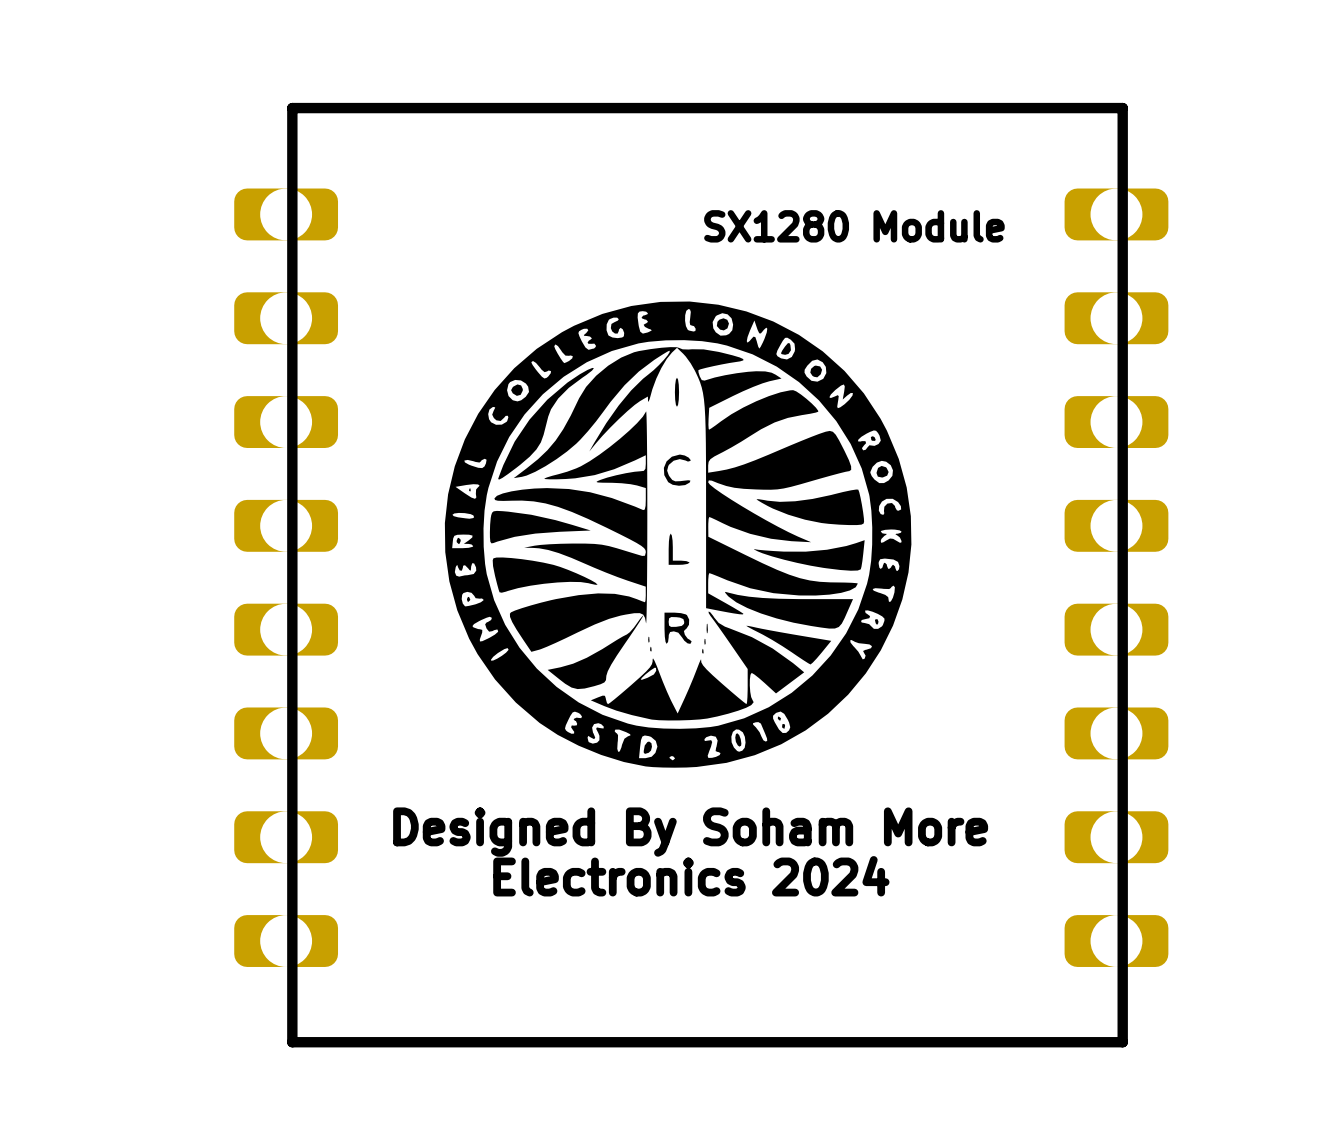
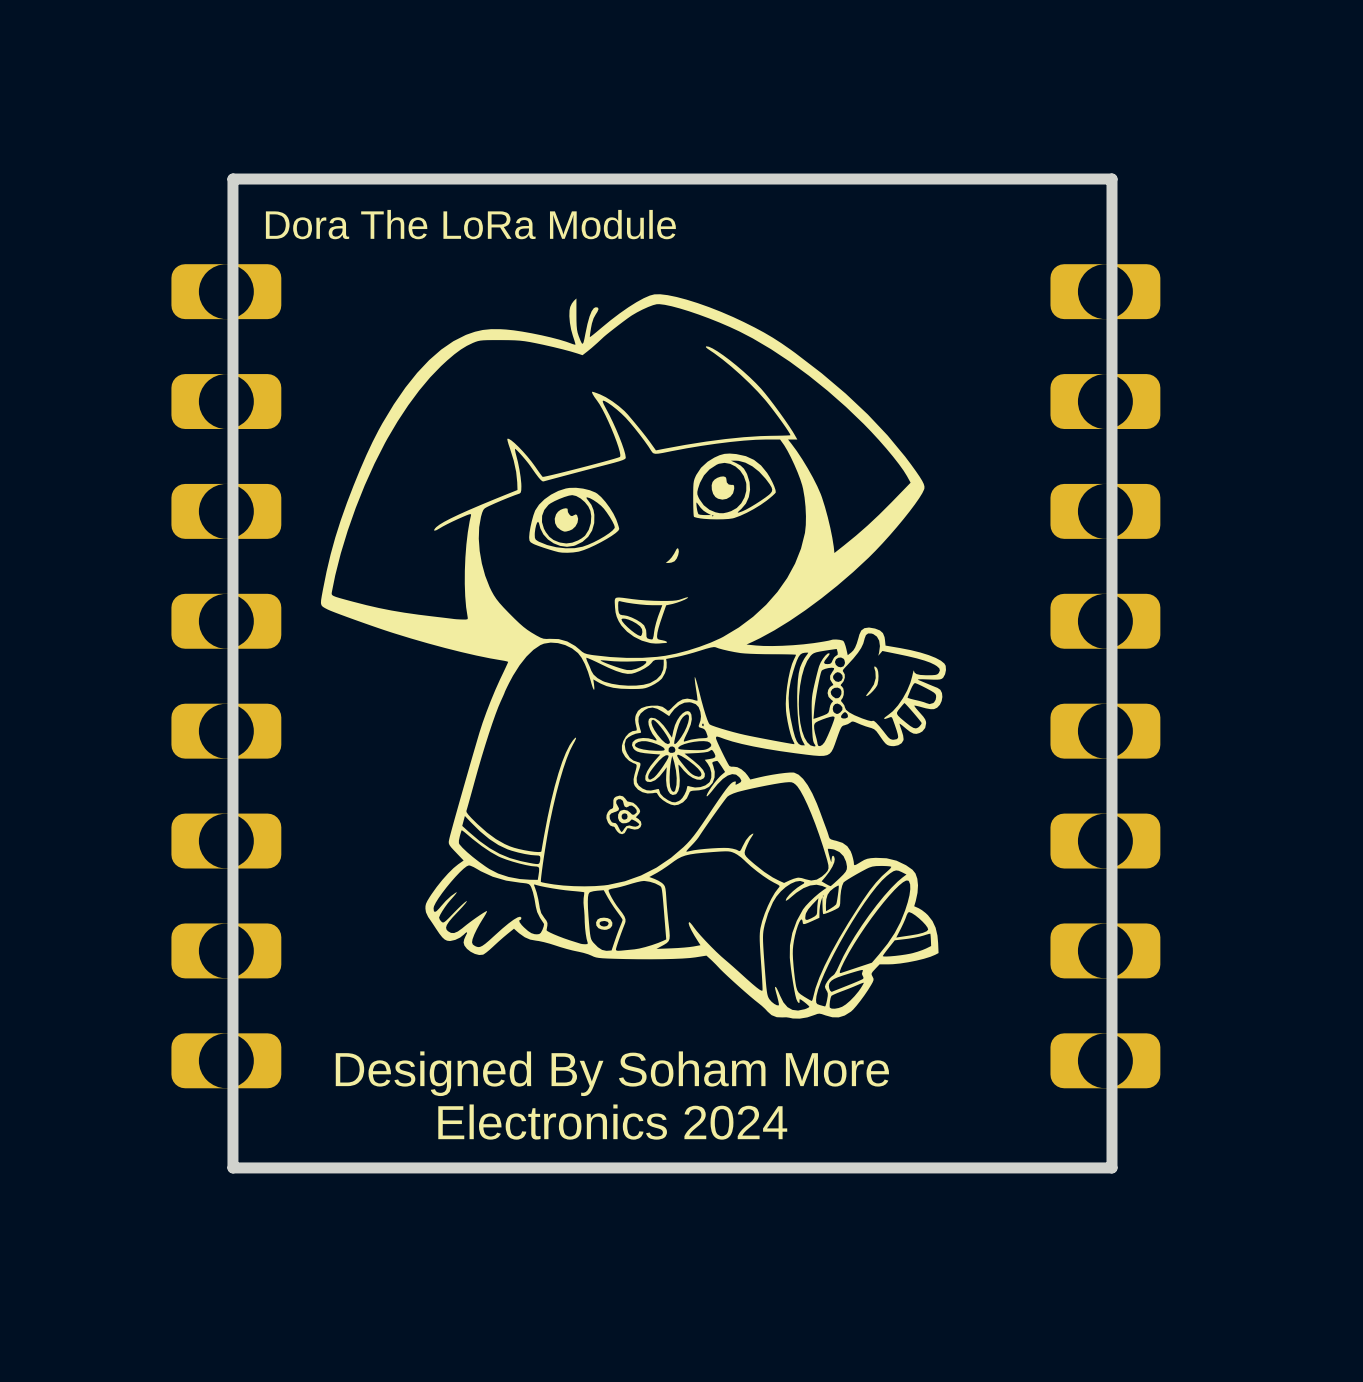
text: none -> Dora The LoRa Module (470, 224)
text: SX1280 Module (854, 226) -> none
drawing shape: [444, 301, 912, 768] -> [320, 294, 946, 1019]
text position: Designed By Soham More (690, 832) -> Designed By Soham More (612, 1073)
text position: Electronics 2024 (691, 876) -> Electronics 2024 (612, 1122)

